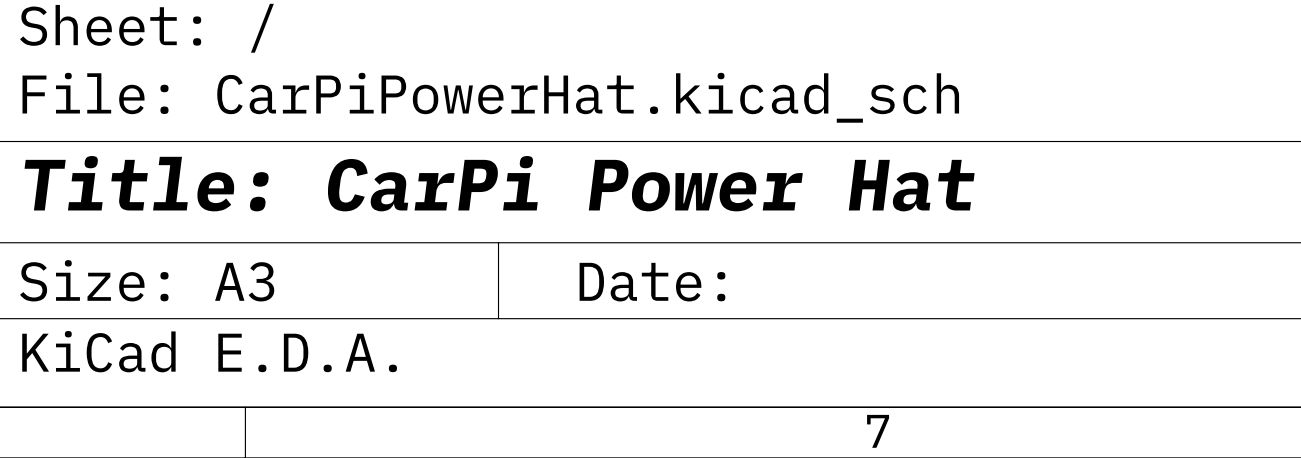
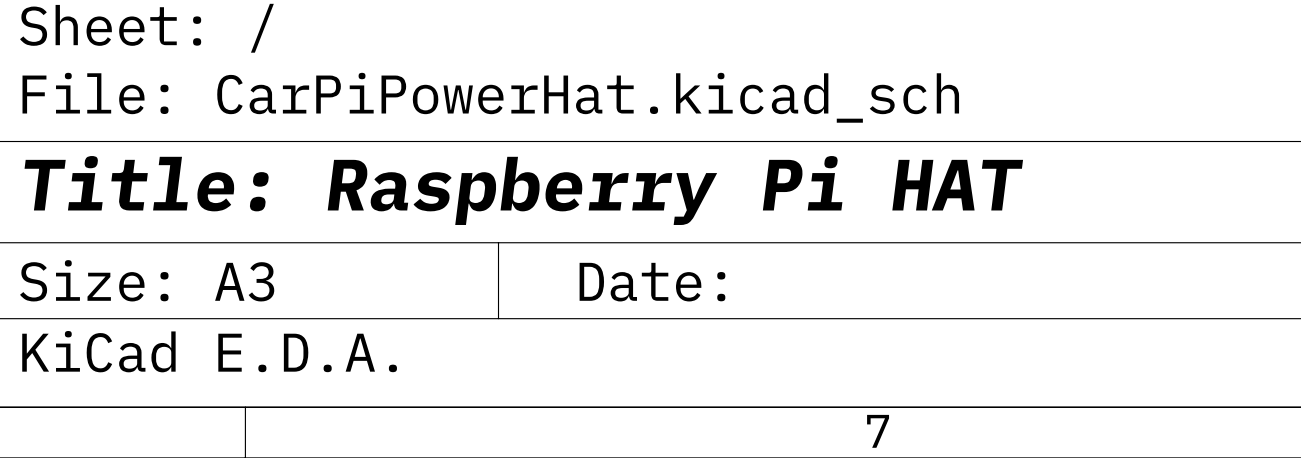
title block: Title: CarPi Power Hat (499, 183) -> Title: Raspberry Pi HAT (523, 190)

